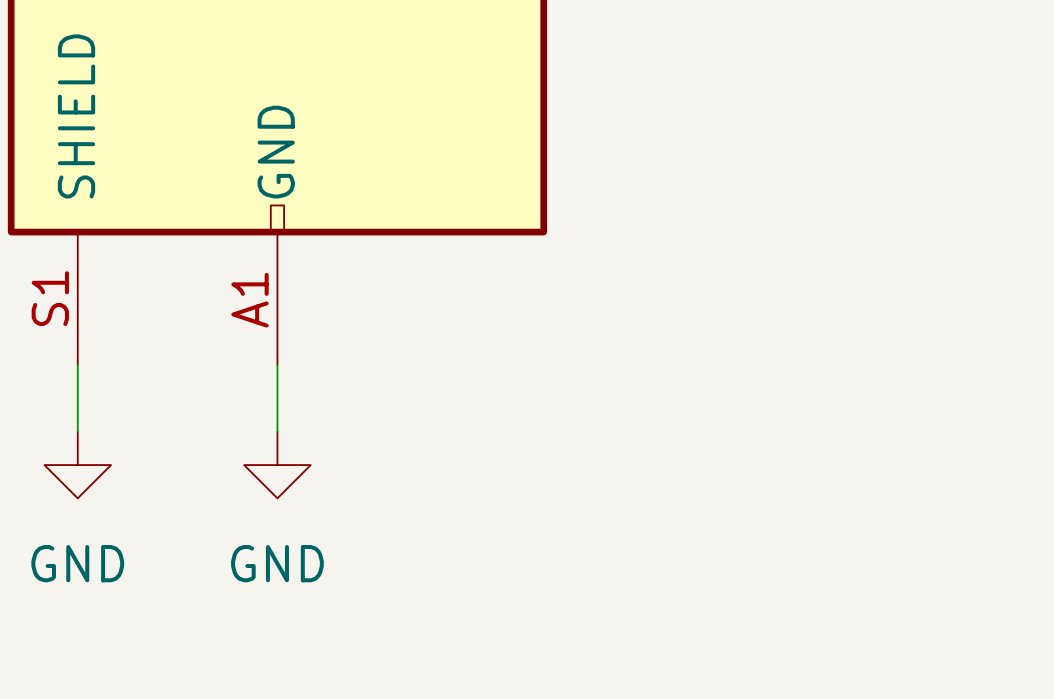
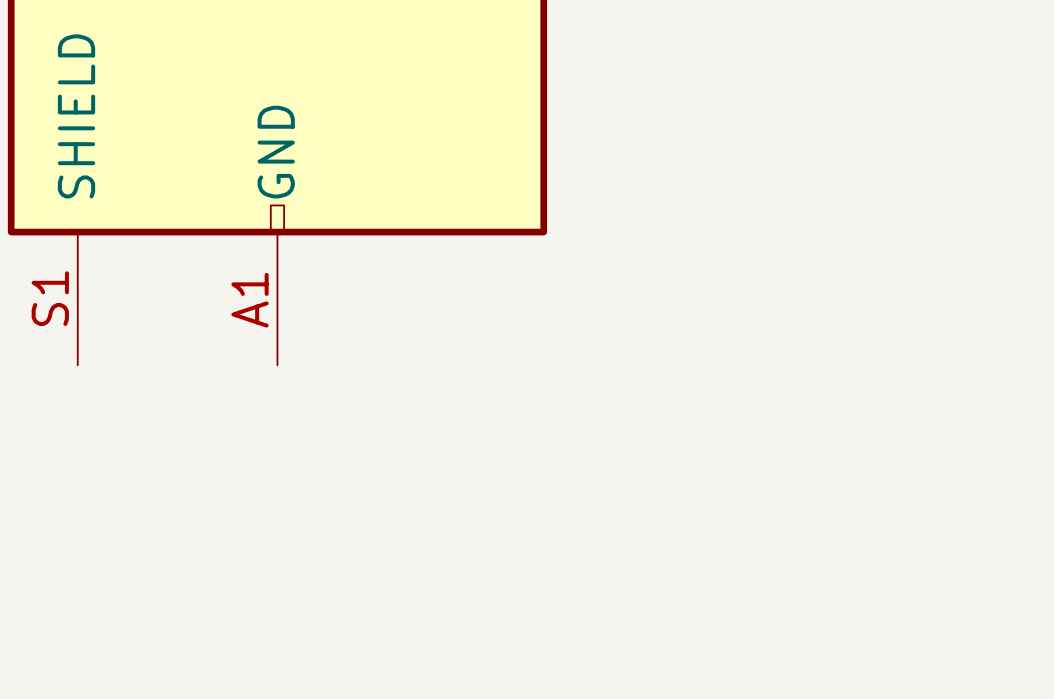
wire: (77, 365) (77, 431) -> none
wire: (277, 365) (277, 431) -> none
power symbol: GND (77, 465) -> none
power symbol: GND (277, 465) -> none

